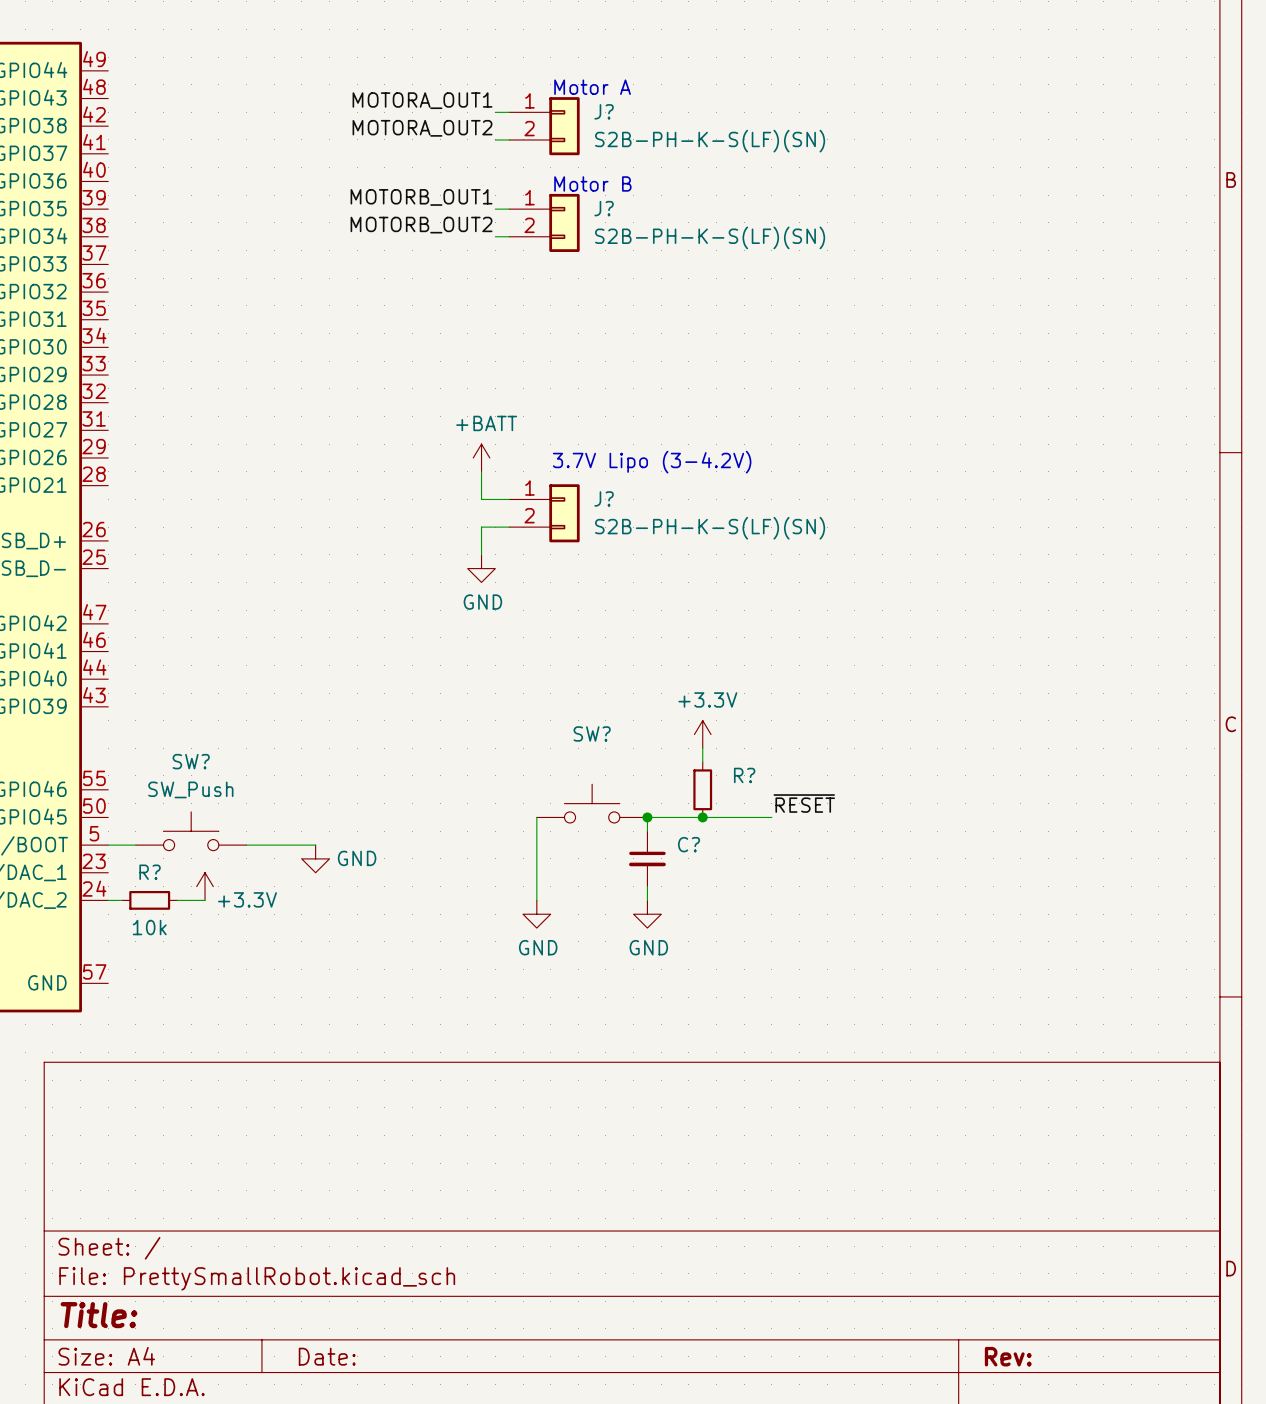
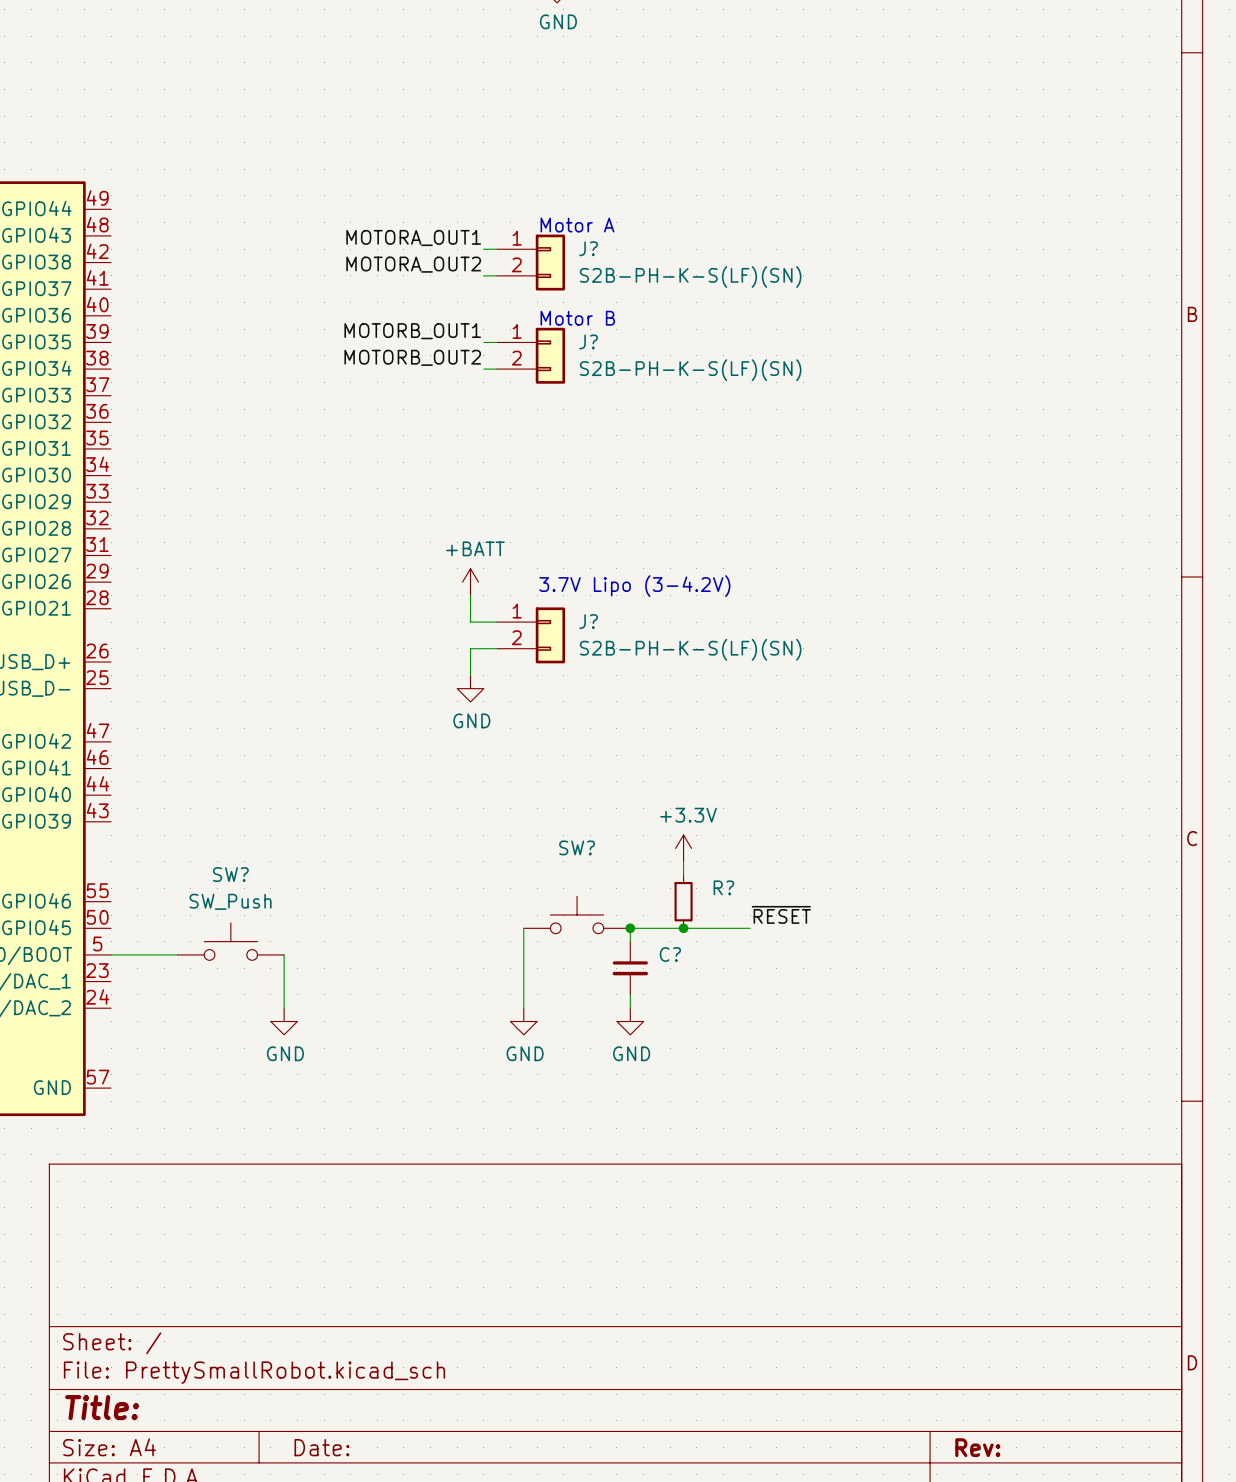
SW? position: (191, 831) -> (230, 941)
wire: (246, 845) (315, 845) -> none
wire: none -> (284, 954) (284, 1008)
power symbol position: GND (315, 858) -> GND (284, 1021)
power symbol text position: GND (357, 858) -> GND (285, 1053)
power symbol: +3.3V (205, 886) -> none
wire: (108, 900) (122, 900) -> none
R?: 10k (149, 900) -> none
wire: (177, 900) (205, 900) -> none

